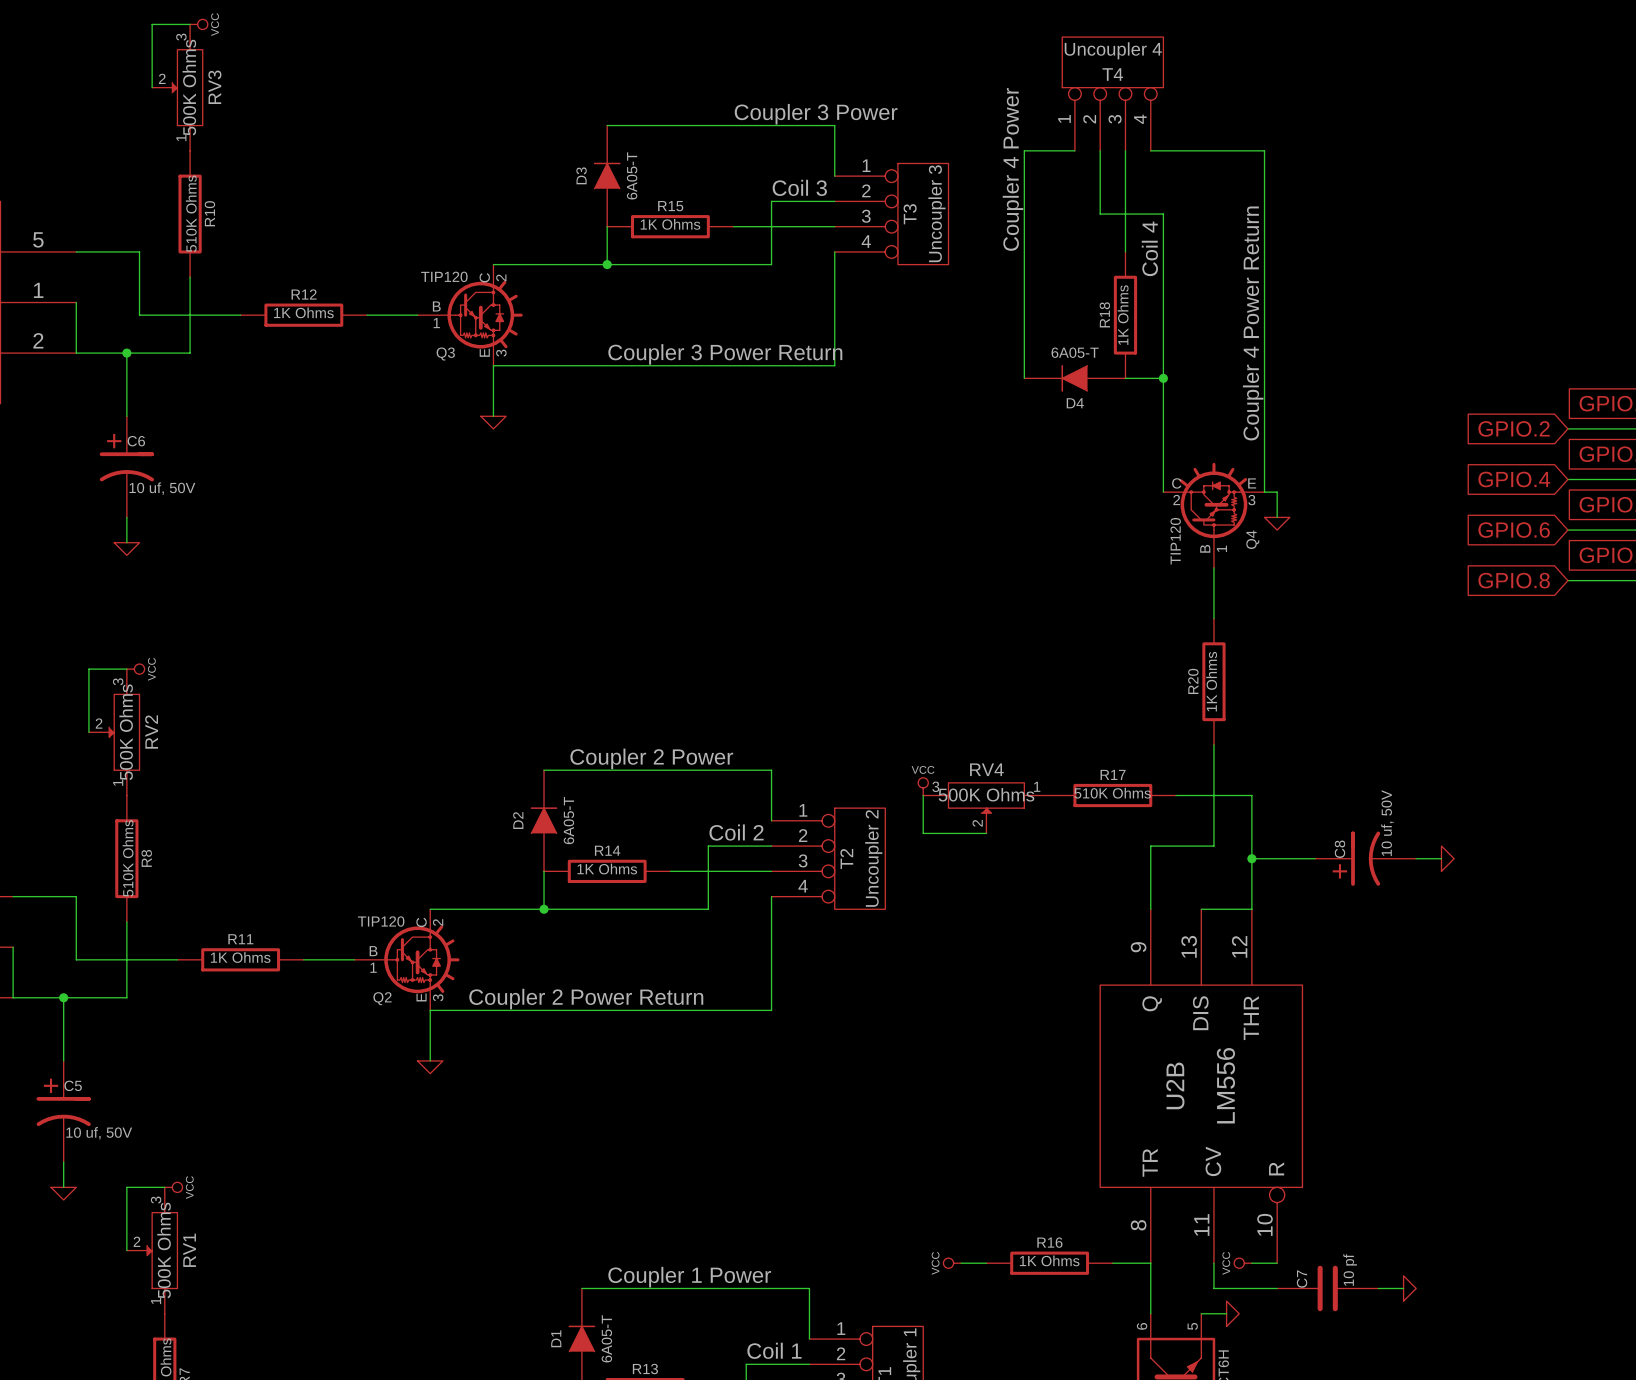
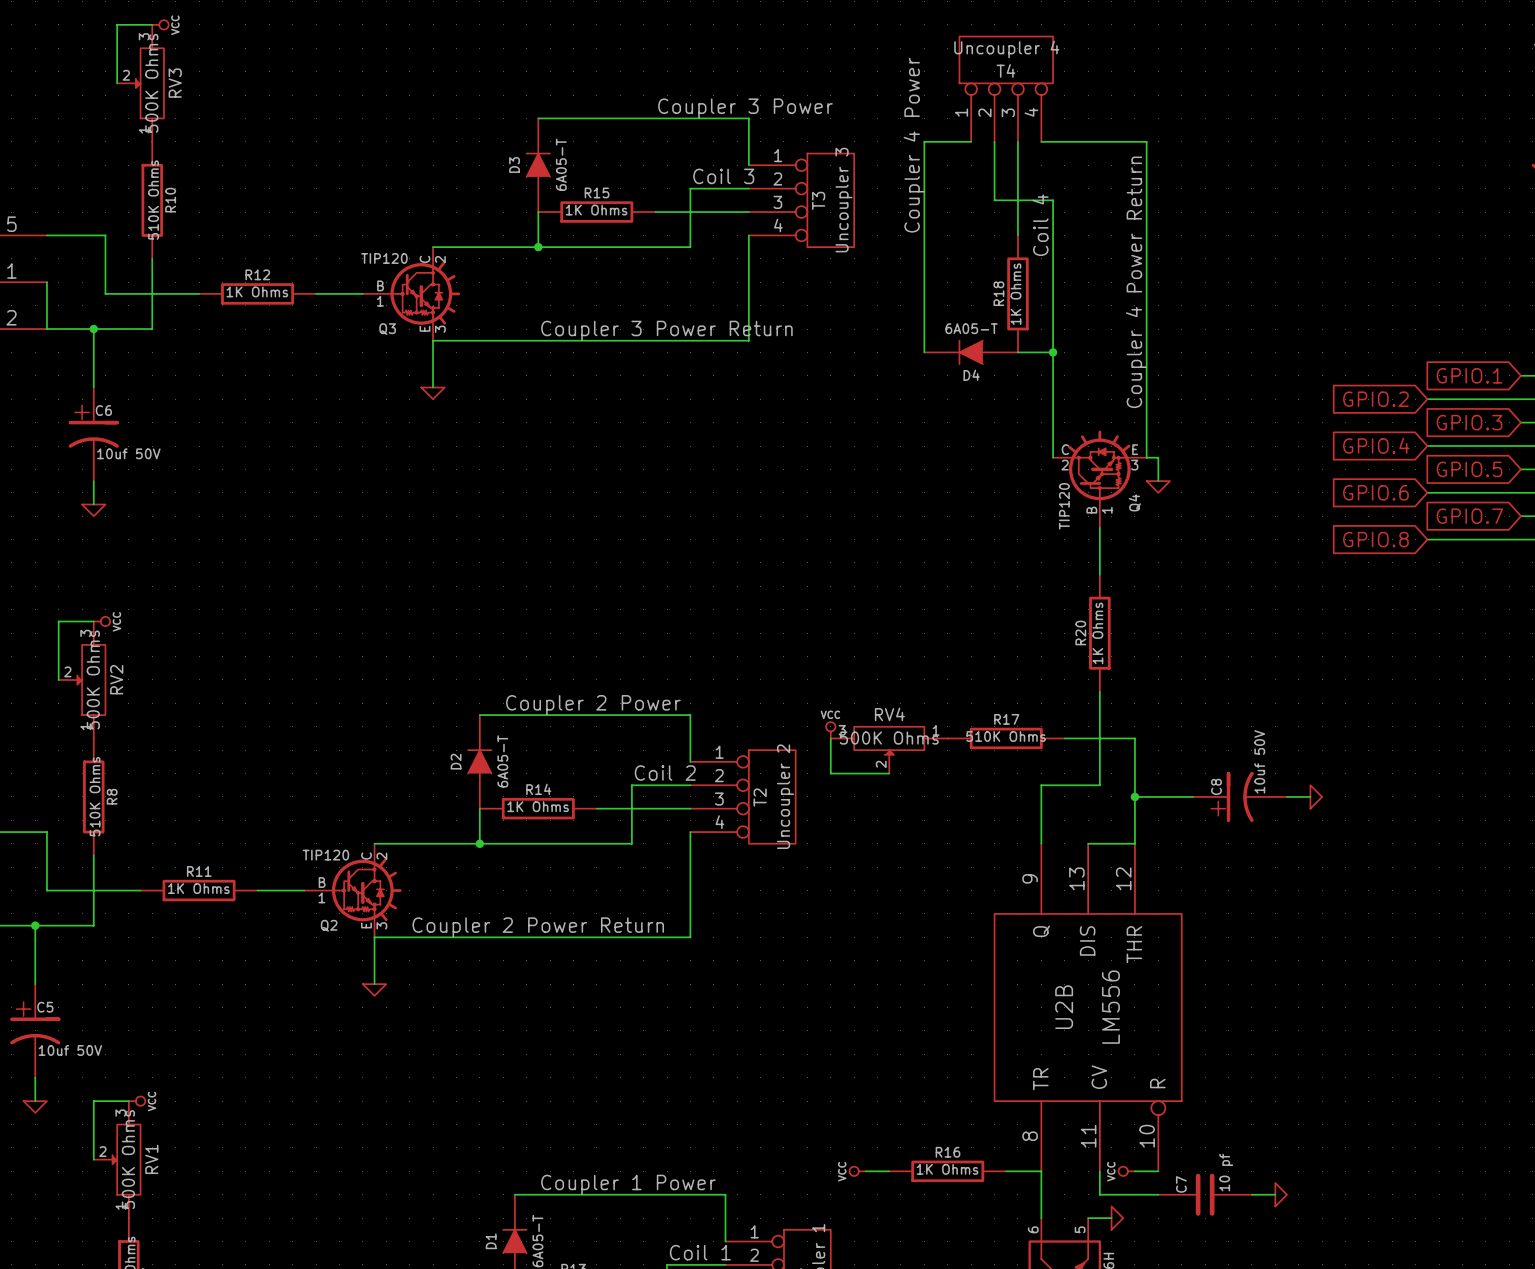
C6 value: 10 uf, 50V (162, 488) -> 10uf 50V (128, 453)
C8 value: 10 uf, 50V (1387, 823) -> 10uf 50V (1259, 761)
C5 value: 10 uf, 50V (99, 1133) -> 10uf 50V (70, 1050)

